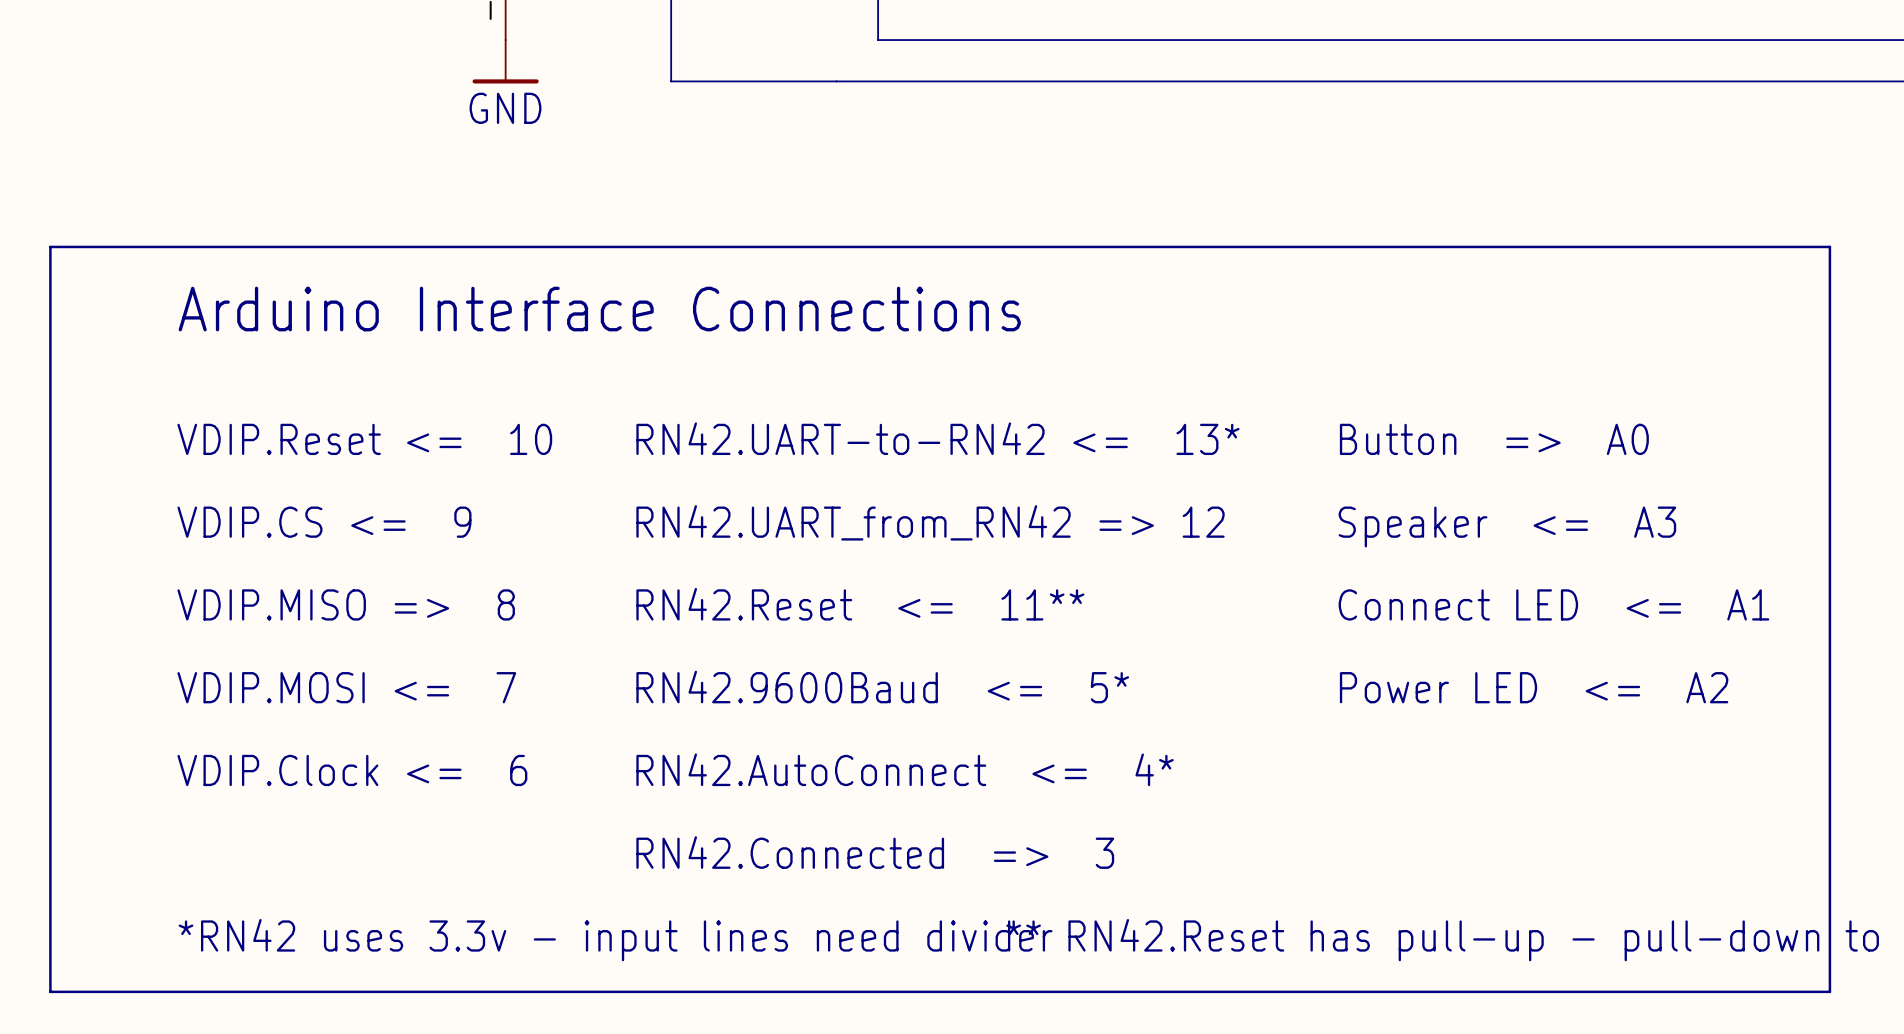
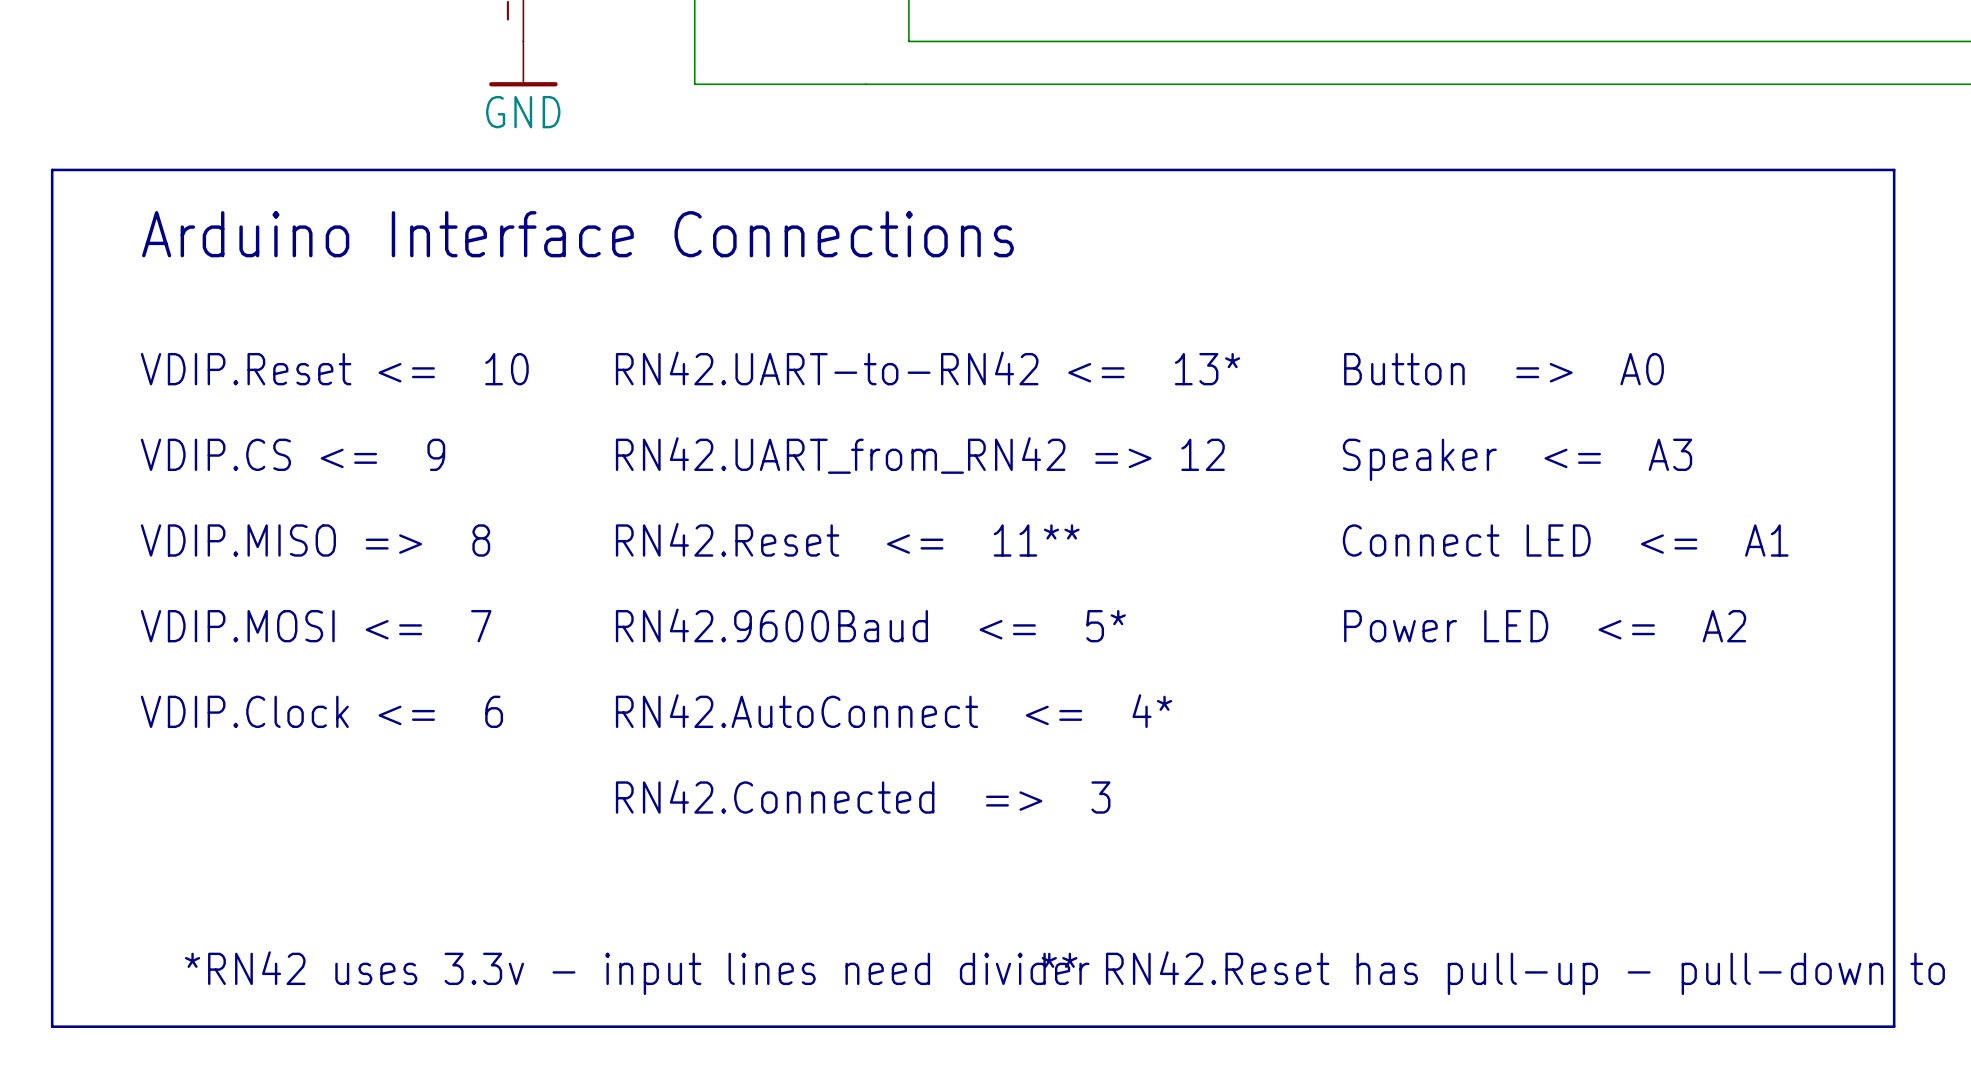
line: (50, 246) (1829, 246) -> (52, 255) (52, 169) (1894, 169) (1894, 255)
text position: Arduino Interface Connections (599, 309) -> Arduino Interface Connections (577, 234)
text position: RN42.UART-to-RN42 <= 13* (937, 438) -> RN42.UART-to-RN42 <= 13* (928, 368)
text position: VDIP.Reset <= 10 (364, 439) -> VDIP.Reset <= 10 (334, 369)
text position: Button => A0 (1494, 439) -> Button => A0 (1504, 369)
text position: VDIP.CS <= 9 (324, 522) -> VDIP.CS <= 9 (293, 454)
text position: RN42.UART_from_RN42 => 12 (930, 522) -> RN42.UART_from_RN42 => 12 (920, 455)
text position: Speaker <= A3 (1507, 526) -> Speaker <= A3 (1517, 459)
text position: VDIP.MISO => 8 (346, 604) -> VDIP.MISO => 8 (315, 540)
text position: RN42.Reset <= 11** (860, 604) -> RN42.Reset <= 11** (847, 539)
text position: Connect LED <= A1 (1553, 604) -> Connect LED <= A1 (1565, 540)
text position: VDIP.MOSI <= 7 (346, 687) -> VDIP.MOSI <= 7 (316, 626)
text position: RN42.9600Baud <= 5* (882, 687) -> RN42.9600Baud <= 5* (870, 625)
text position: Power LED <= A2 (1534, 687) -> Power LED <= A2 (1545, 626)
text position: RN42.AutoConnect <= 4* (905, 769) -> RN42.AutoConnect <= 4* (894, 711)
text position: VDIP.Clock <= 6 (352, 770) -> VDIP.Clock <= 6 (321, 711)
text position: RN42.Connected => 3 (875, 852) -> RN42.Connected => 3 (863, 796)

